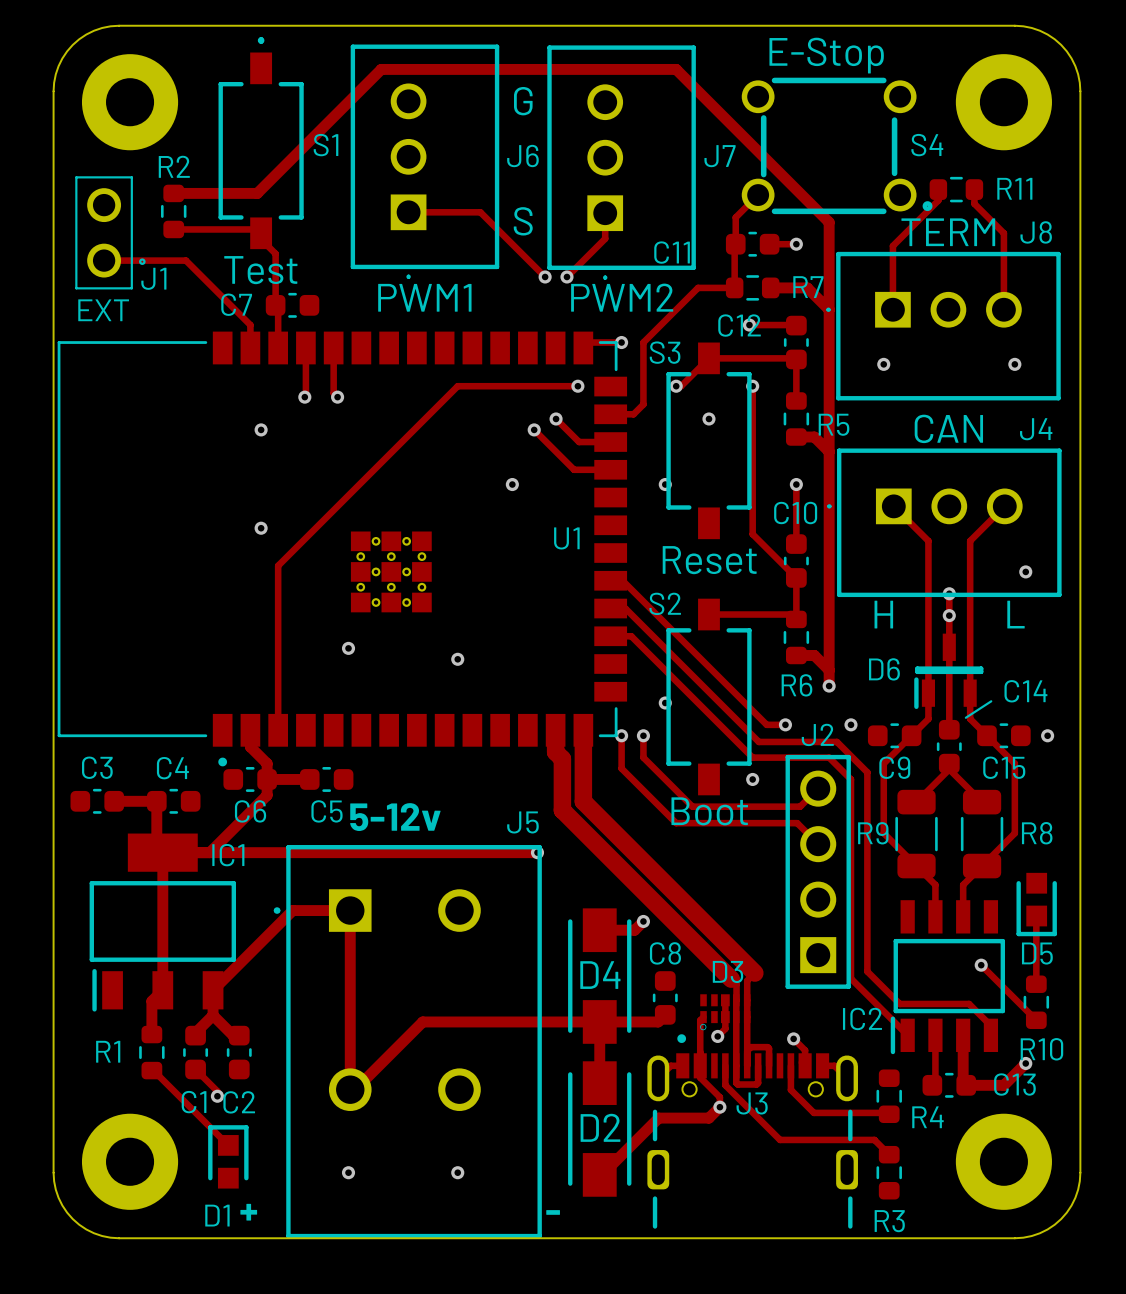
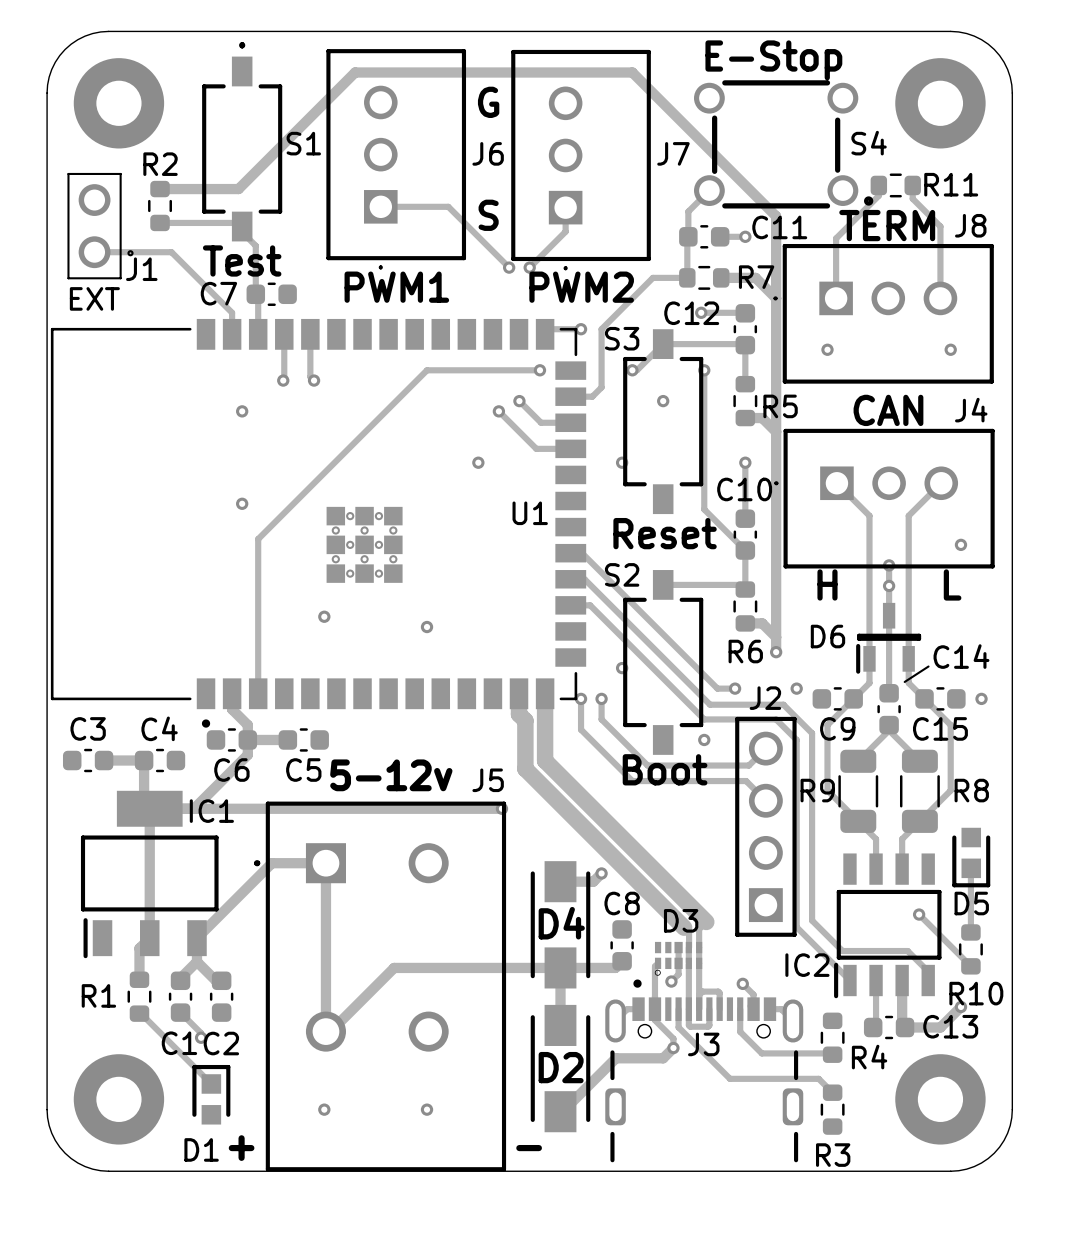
C11 name position: C11 (672, 252) -> C11 (779, 227)

